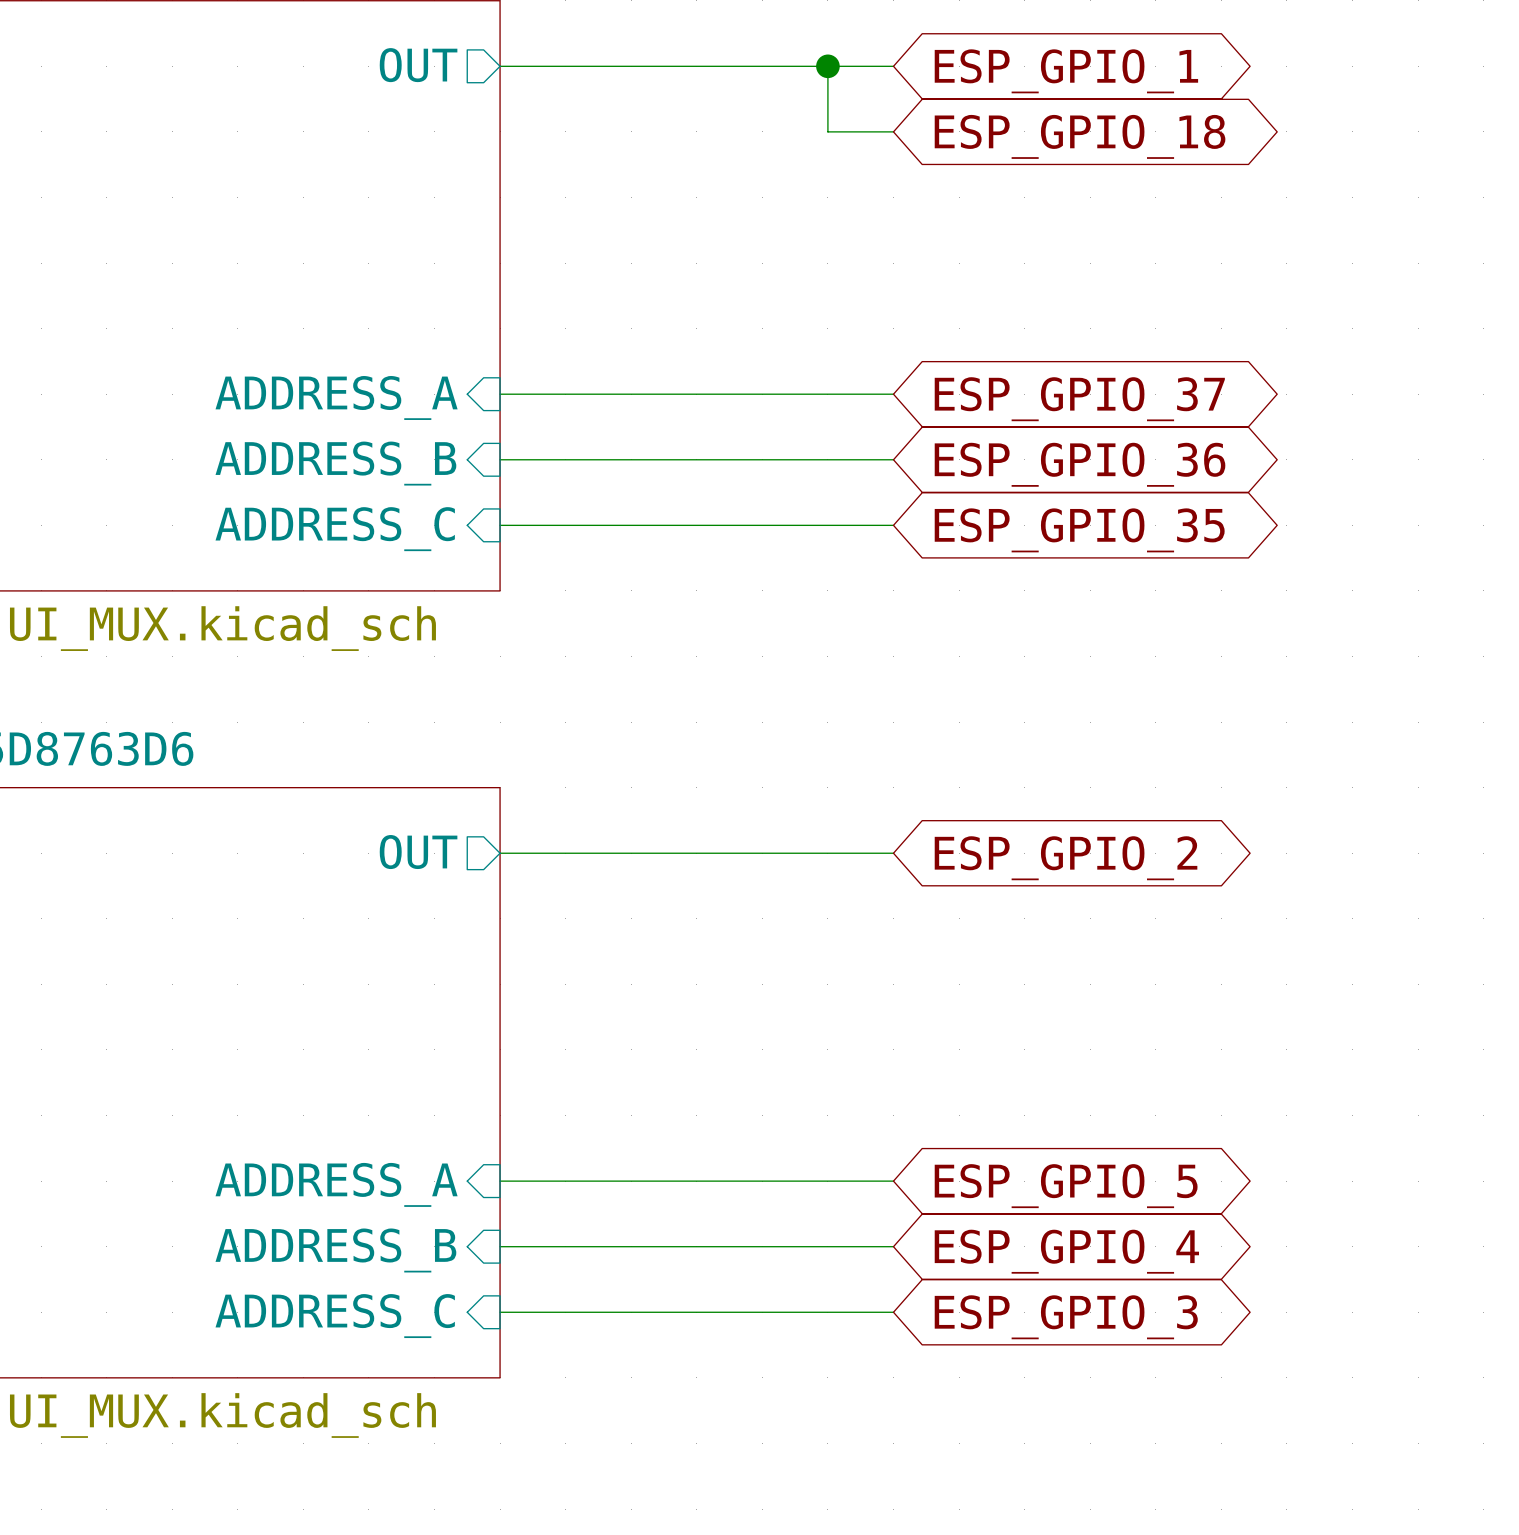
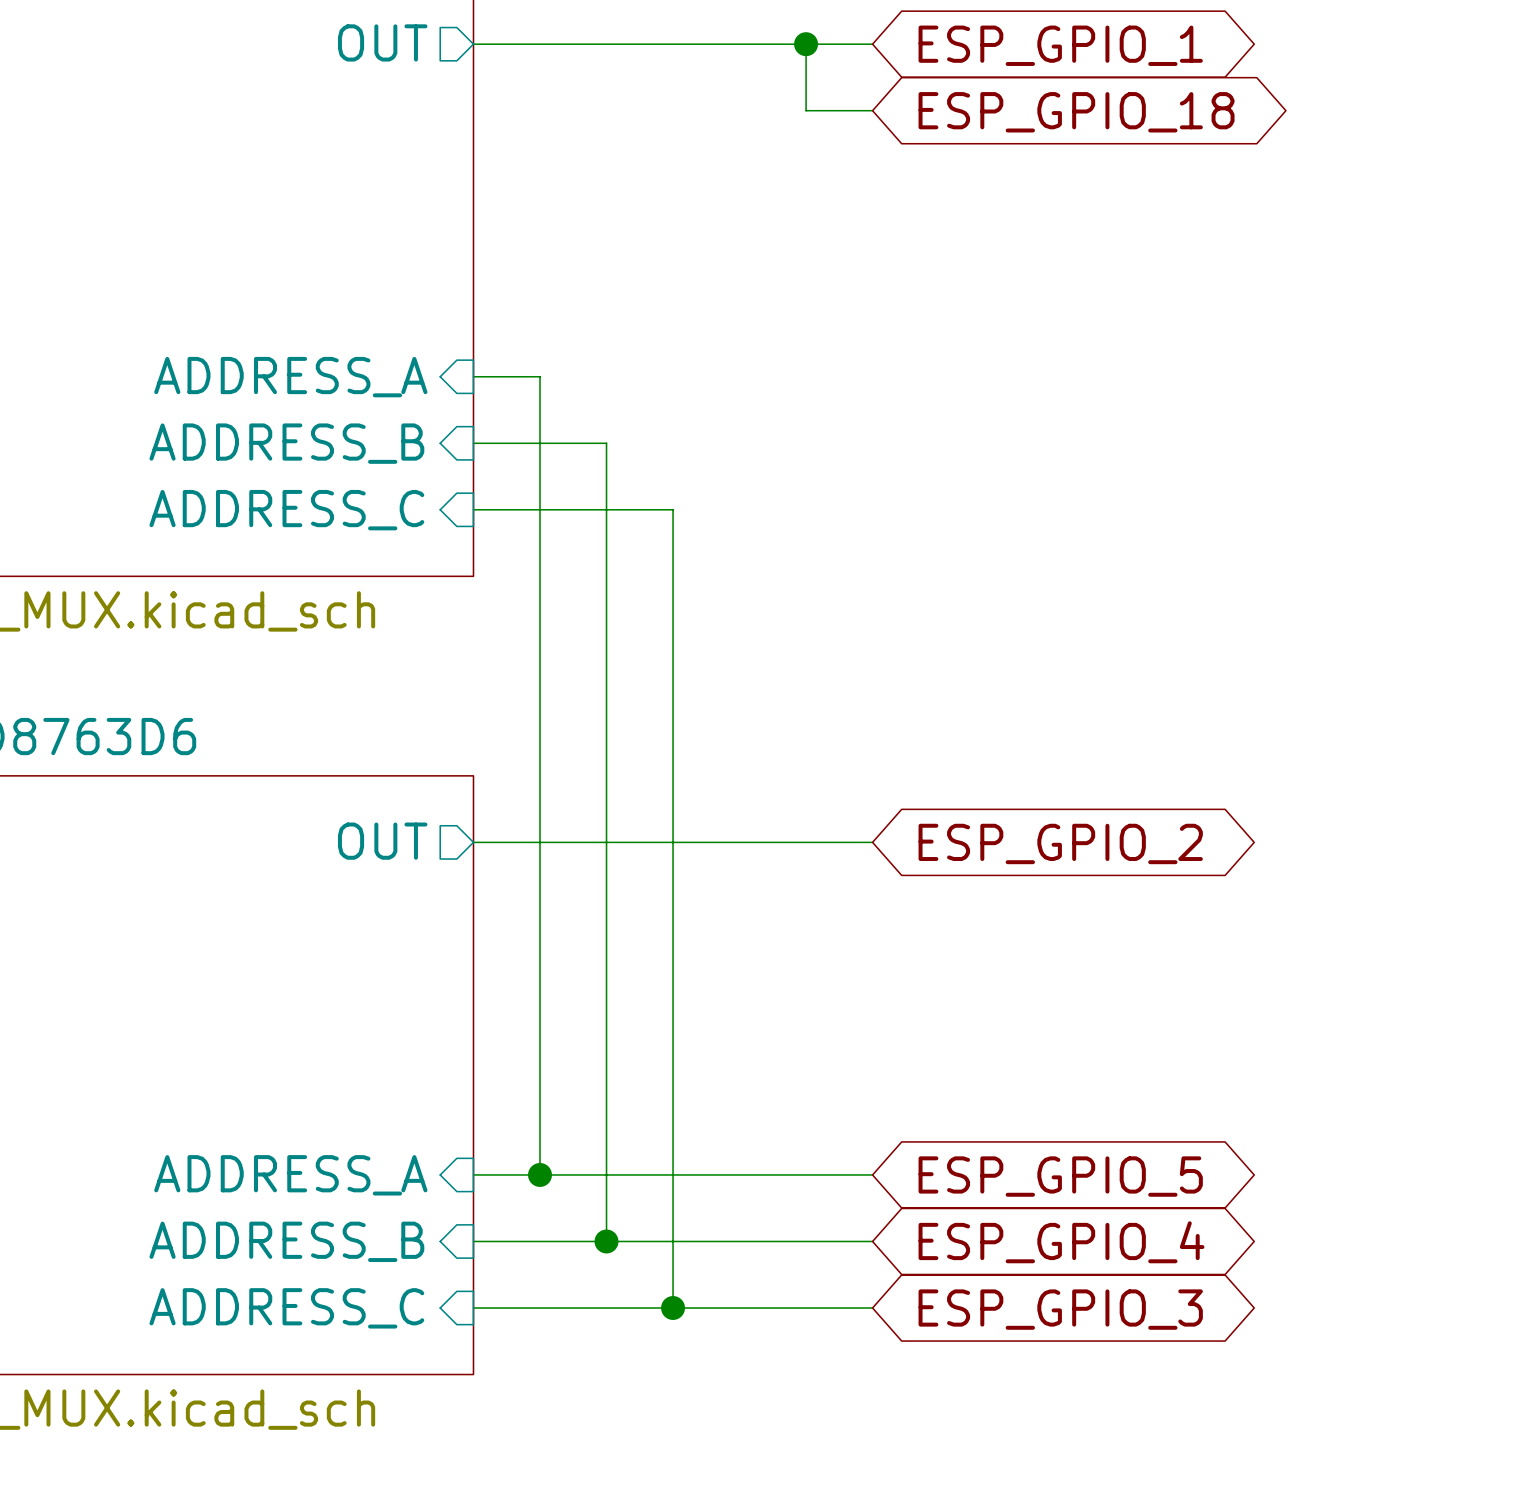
wire: (565, 394) (893, 394) -> (540, 376) (540, 1174)
global label: ESP_GPIO_37 (1079, 399) -> none
wire: (631, 459) (893, 459) -> (606, 443) (606, 1241)
global label: ESP_GPIO_36 (1080, 464) -> none
wire: (696, 525) (893, 525) -> (673, 509) (673, 1308)
global label: ESP_GPIO_35 (1079, 530) -> none
junction: none -> (540, 1174)
junction: none -> (606, 1241)
junction: none -> (673, 1308)

